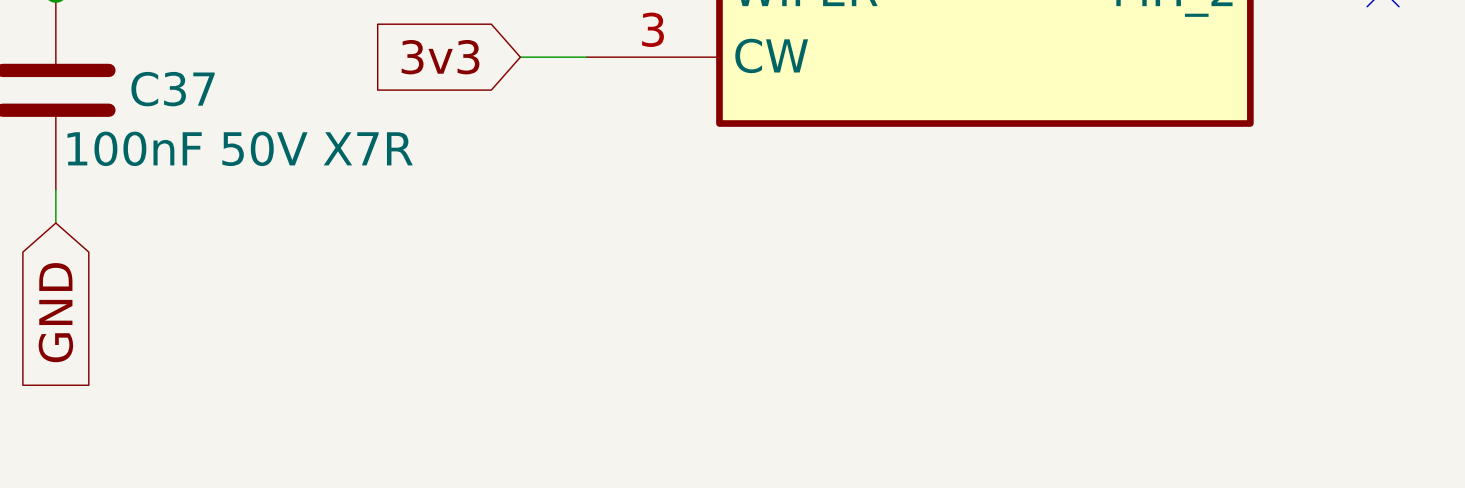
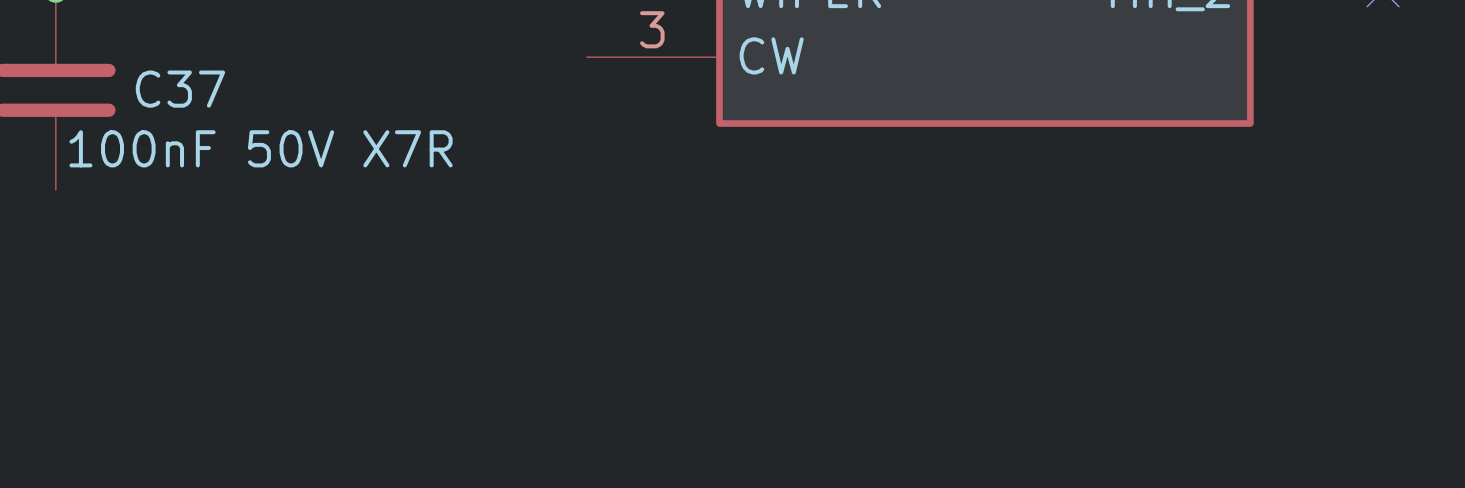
global label: 3v3 (440, 57) -> none
wire: (520, 57) (586, 57) -> none
wire: (55, 189) (55, 223) -> none
global label: GND (55, 312) -> none

